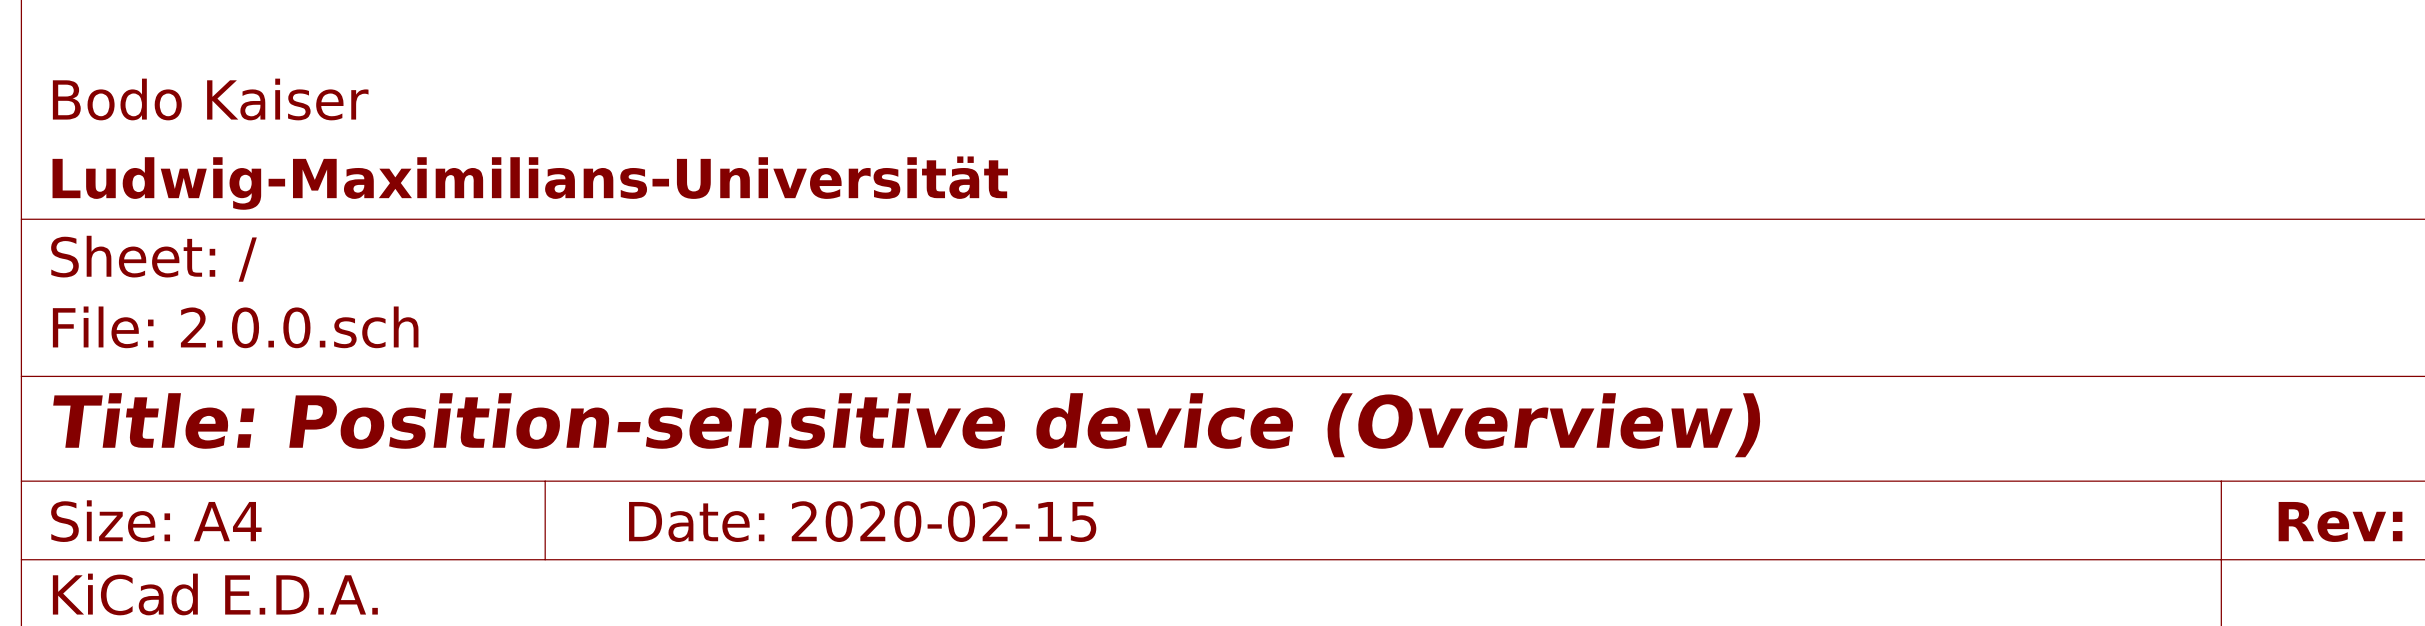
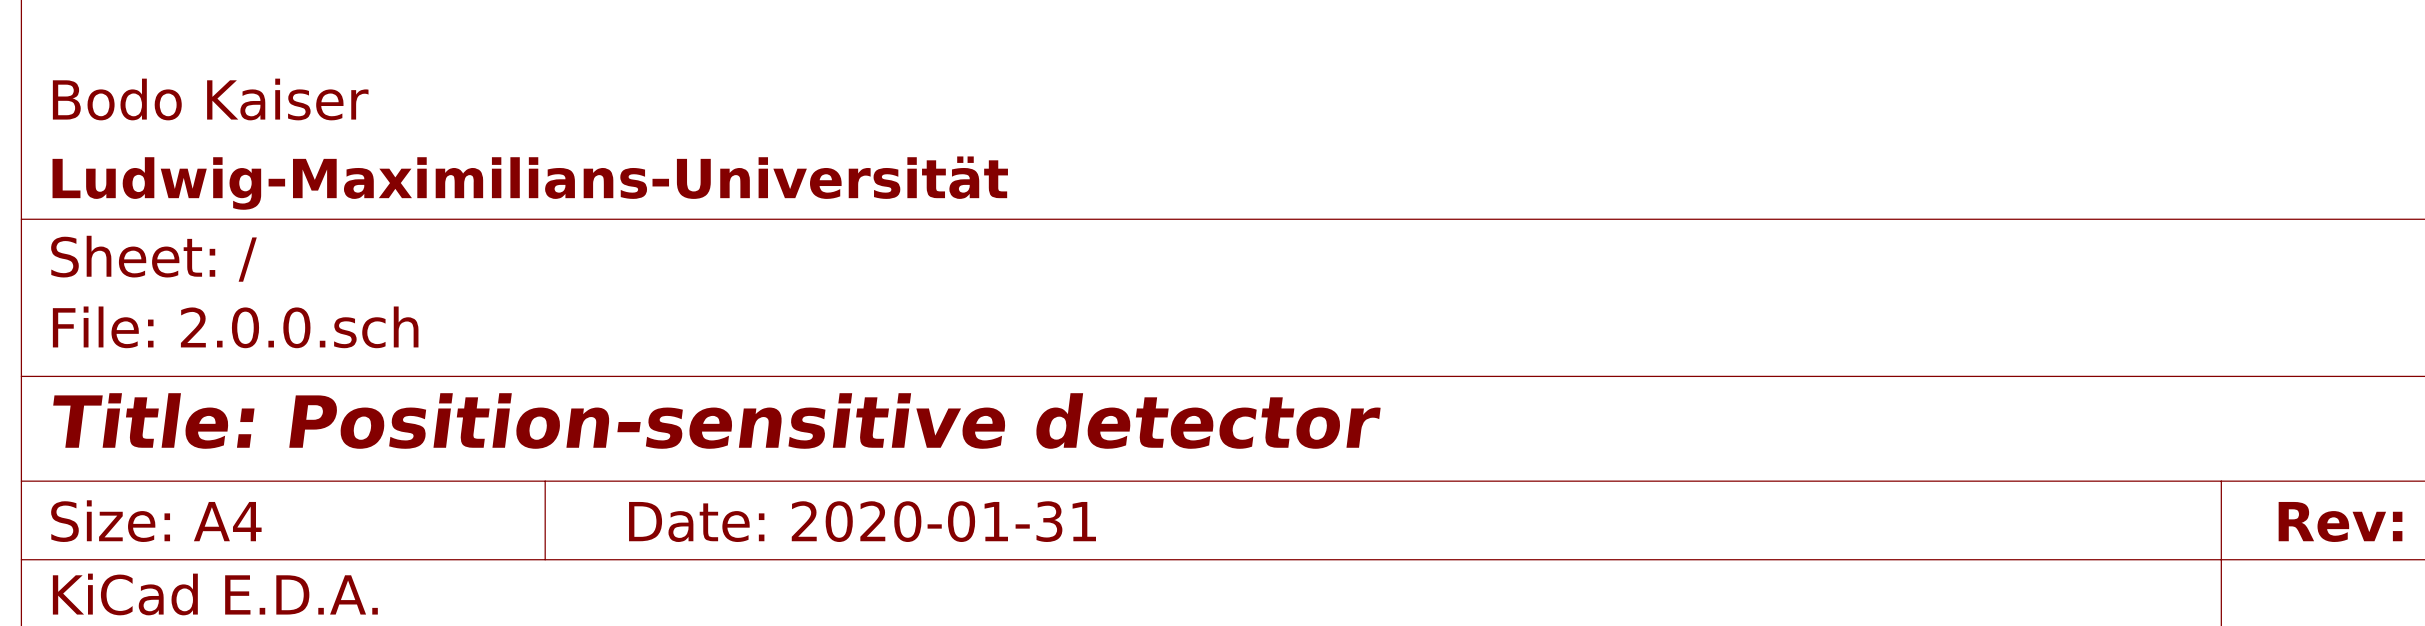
title block: Title: Position-sensitive device (Overview) (906, 425) -> Title: Position-sensitive detector (716, 420)
title block: Date: 2020-02-15 (862, 521) -> Date: 2020-01-31 (862, 521)

